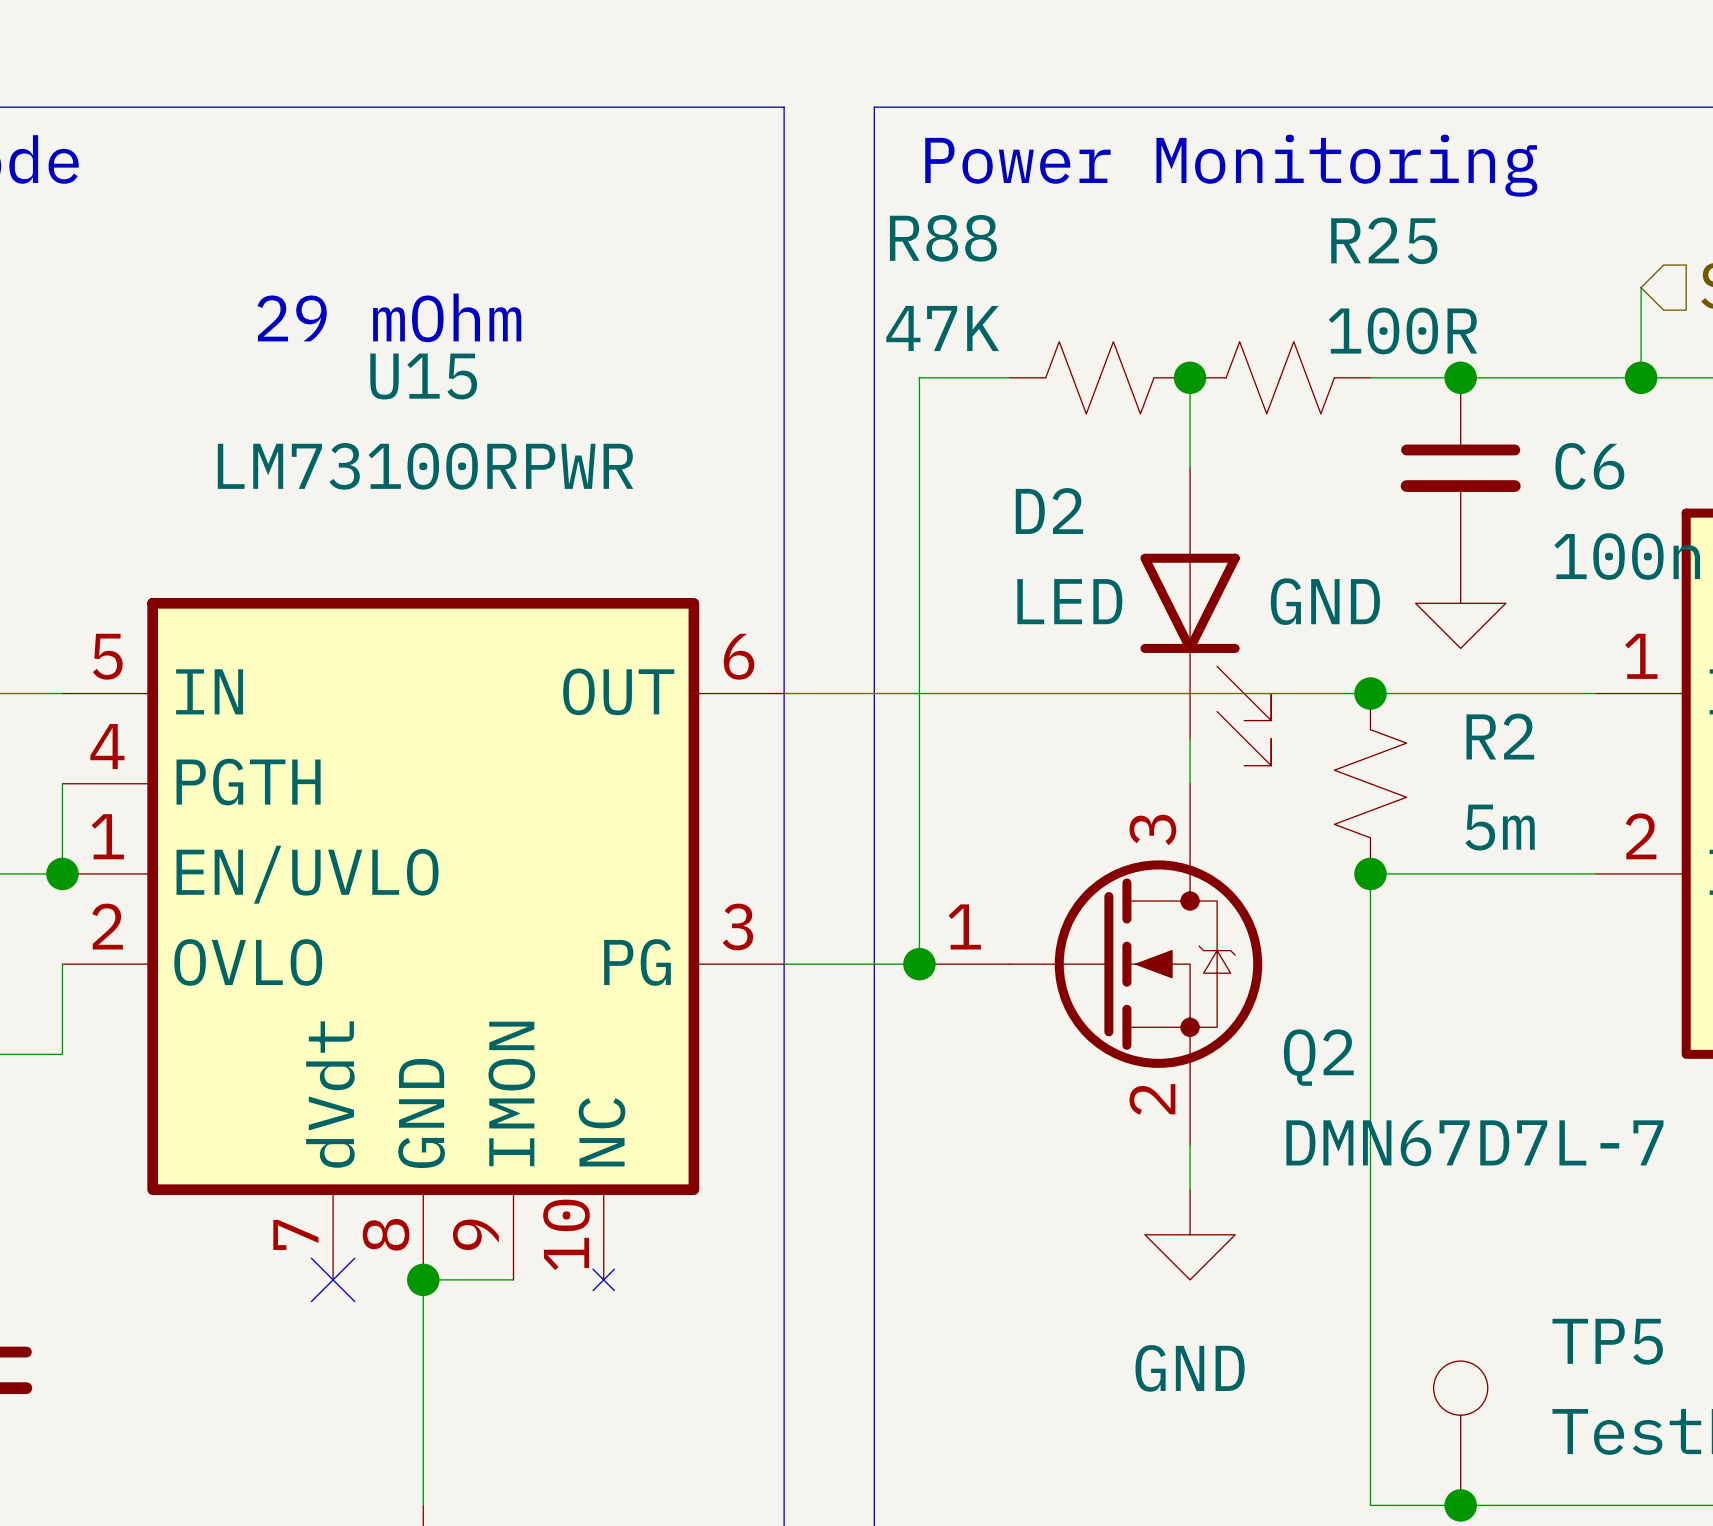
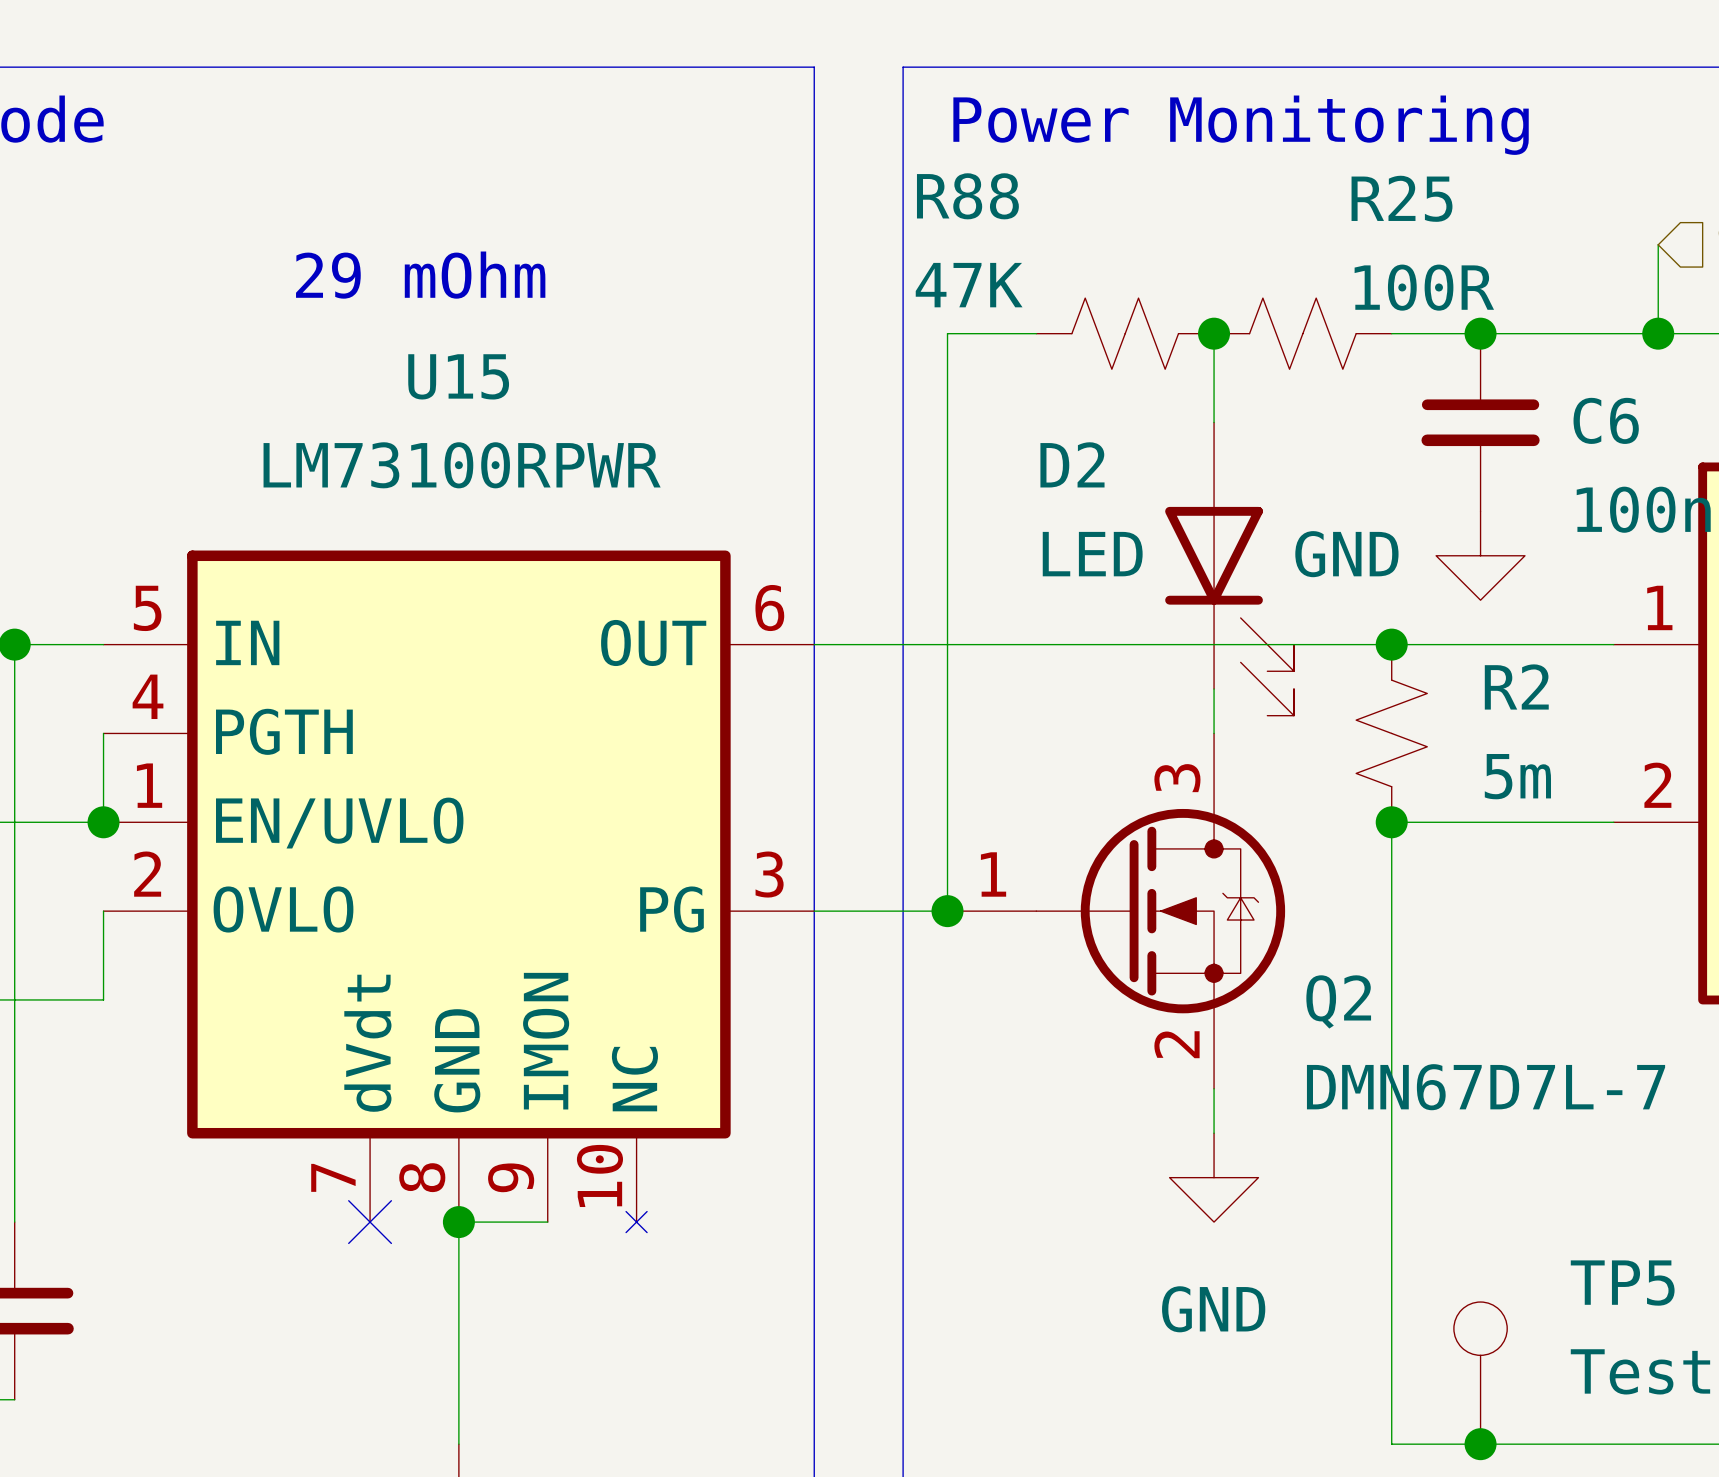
U15 name position: U15 (423, 376) -> U15 (458, 376)
U15 value position: LM73100RPWR (425, 466) -> LM73100RPWR (462, 465)

